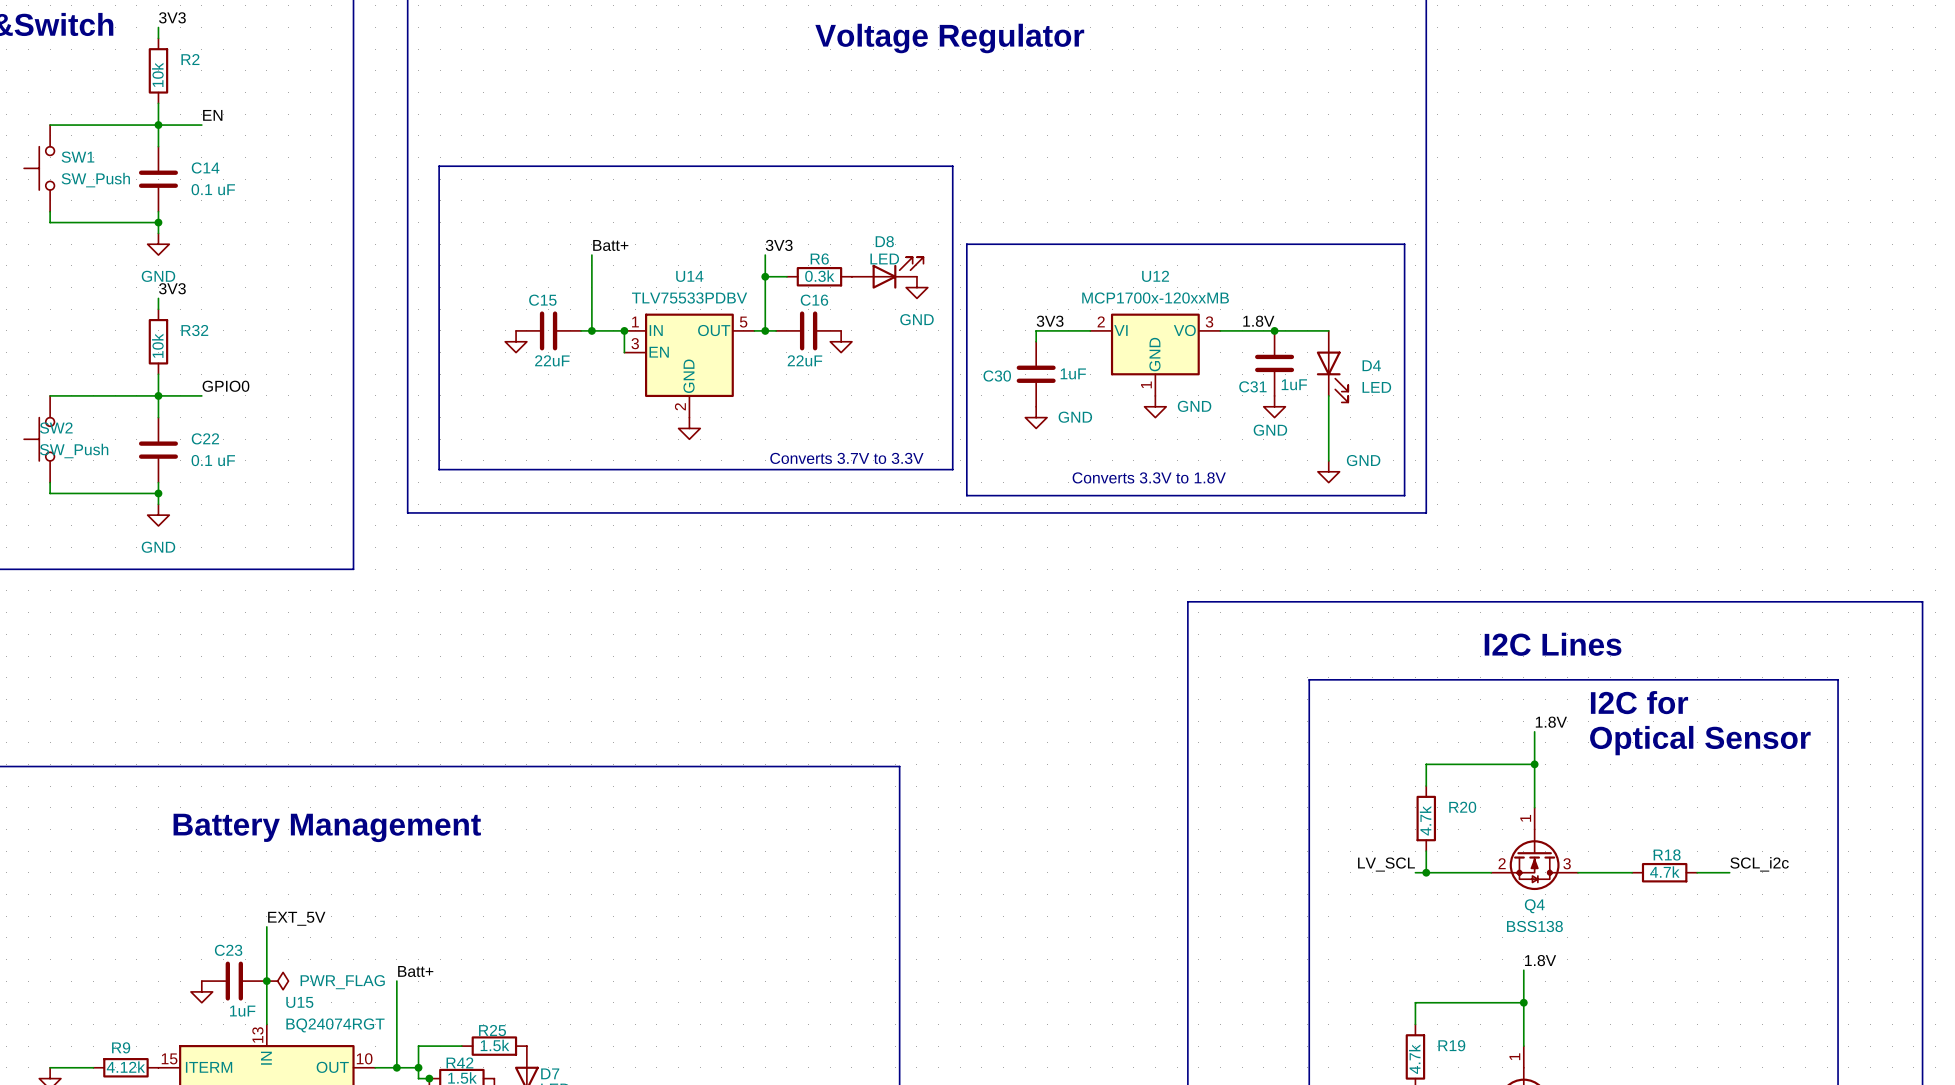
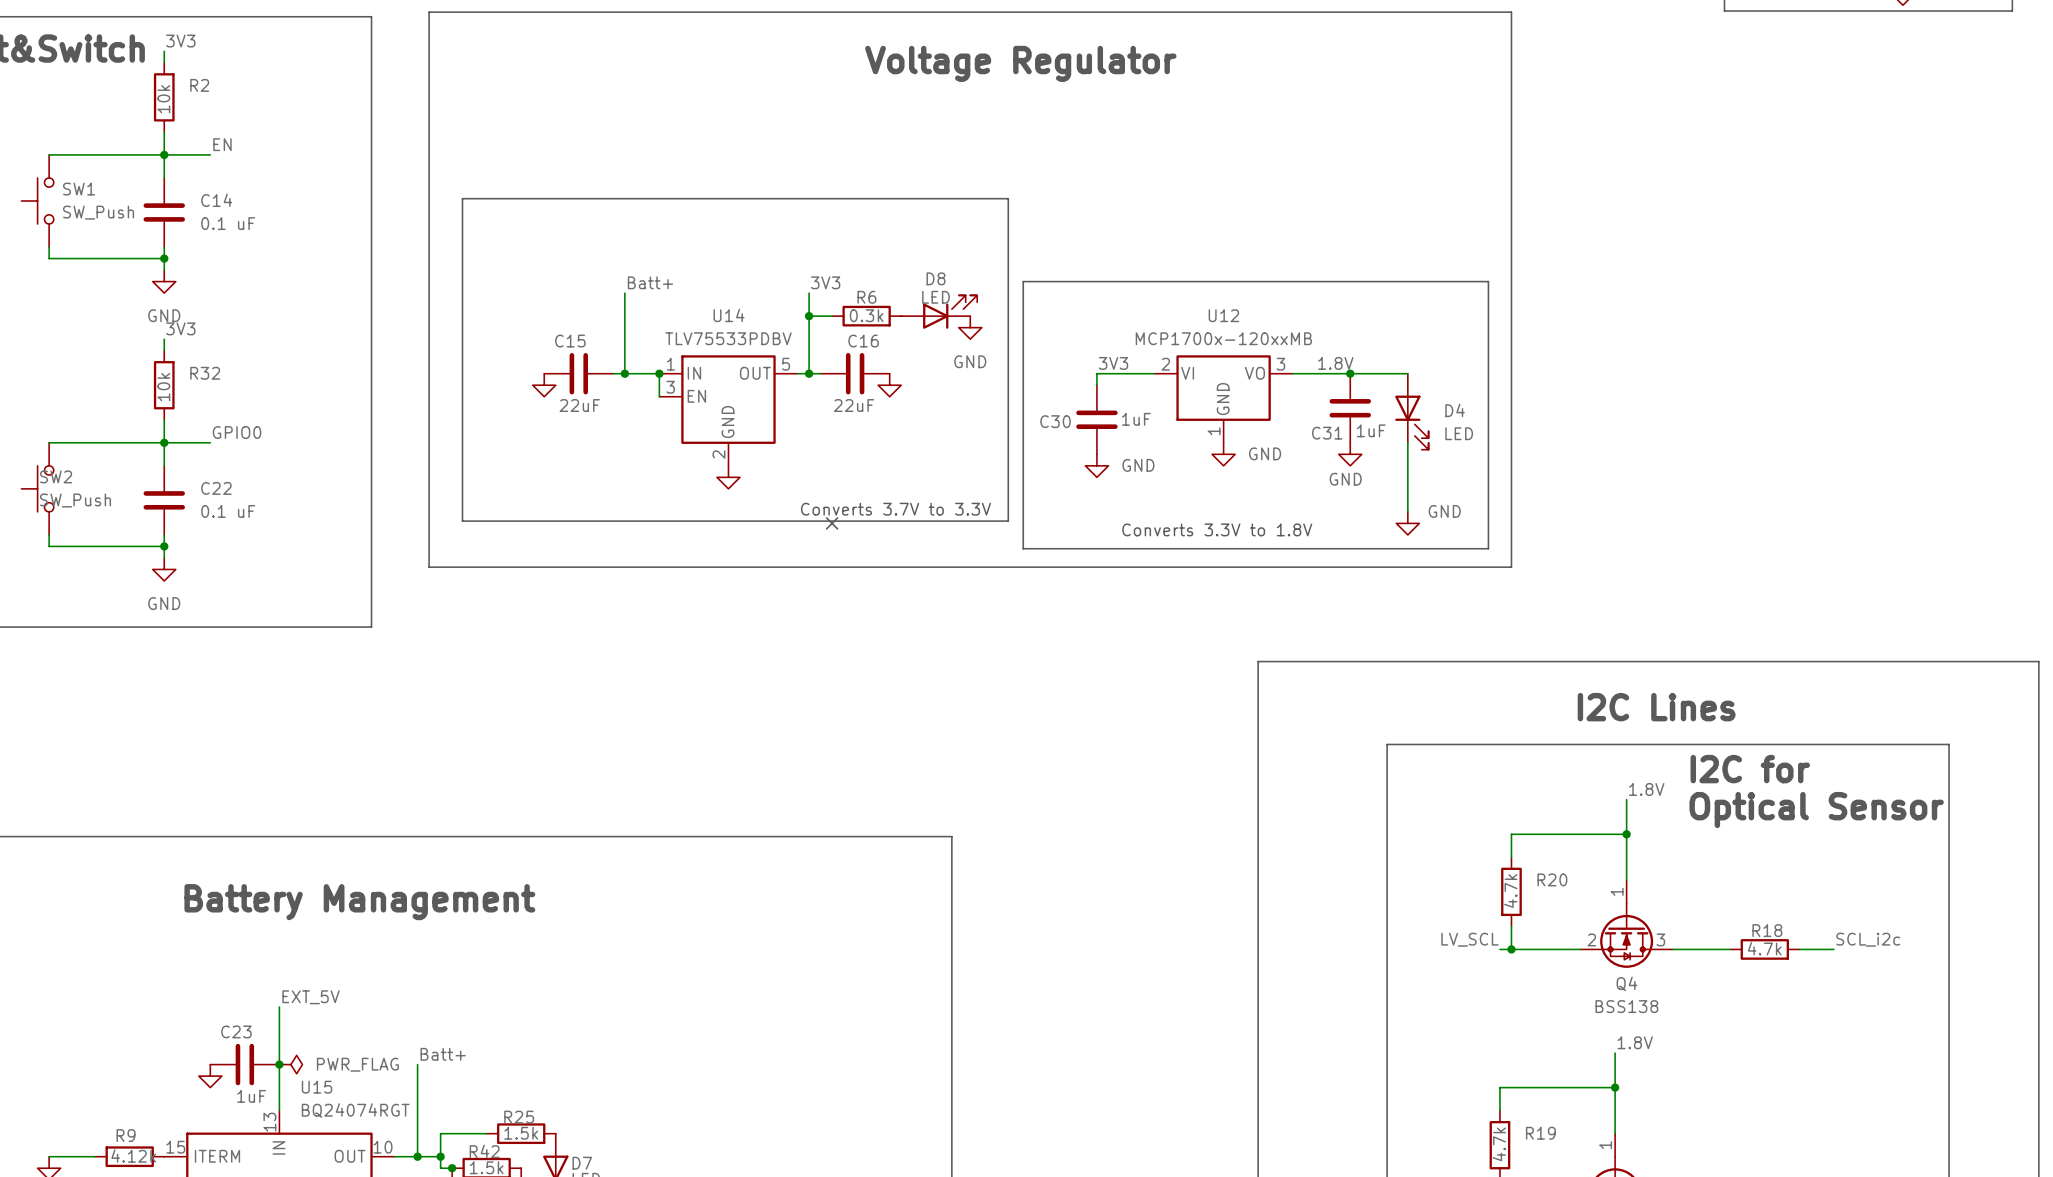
no-connect mark: none -> (832, 523)

